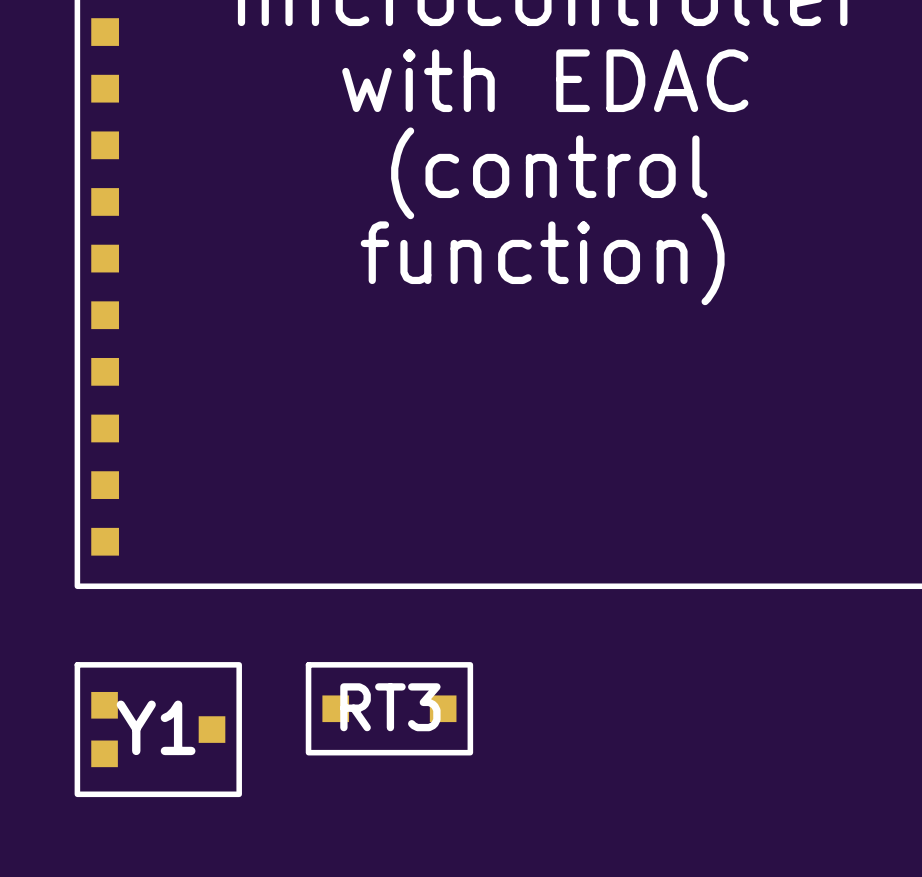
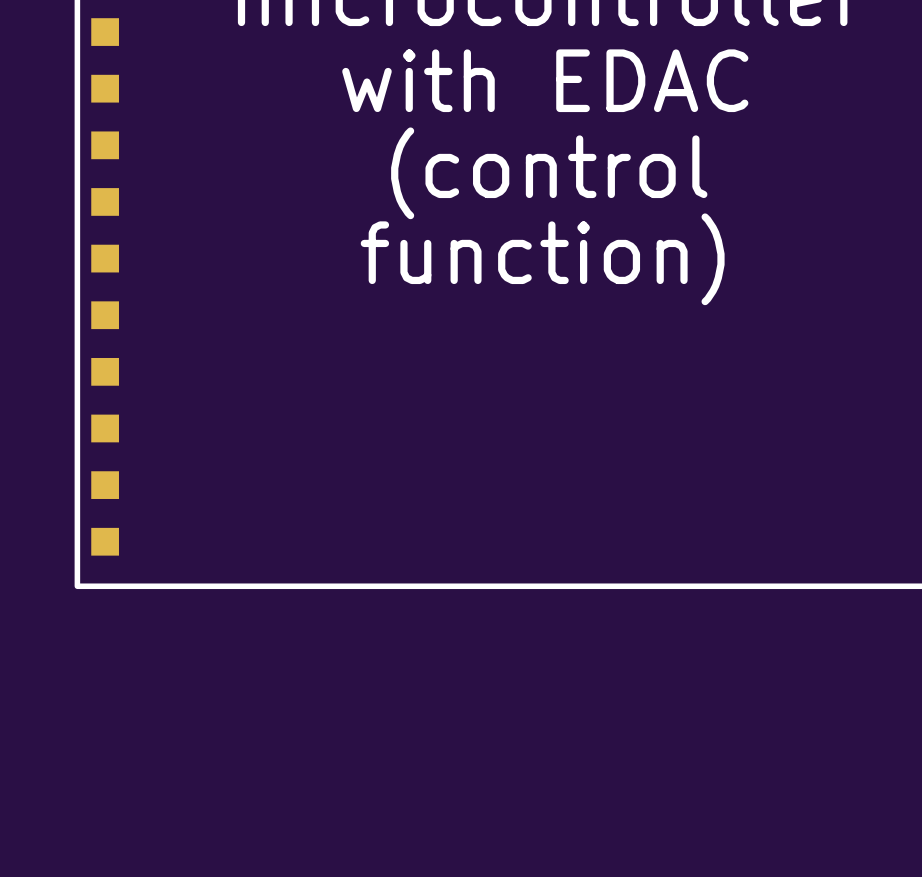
part: (389, 708) -> none
part: (158, 729) -> none

